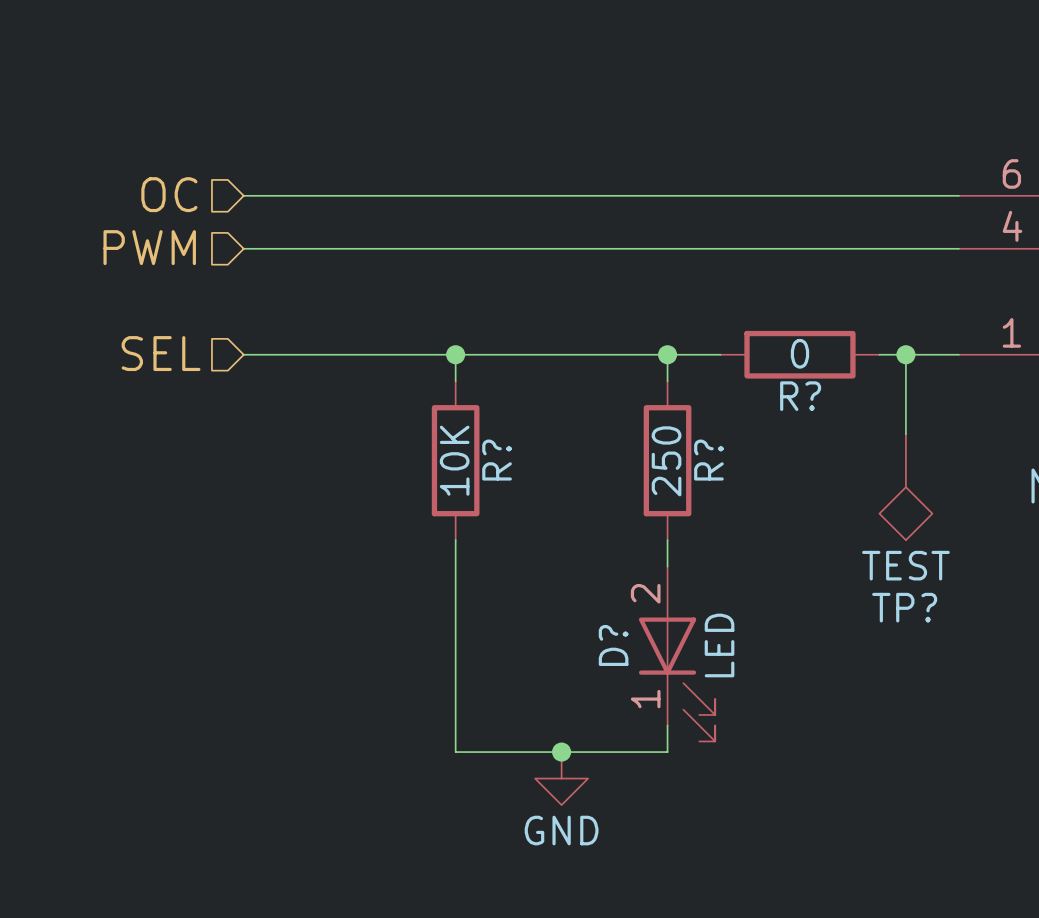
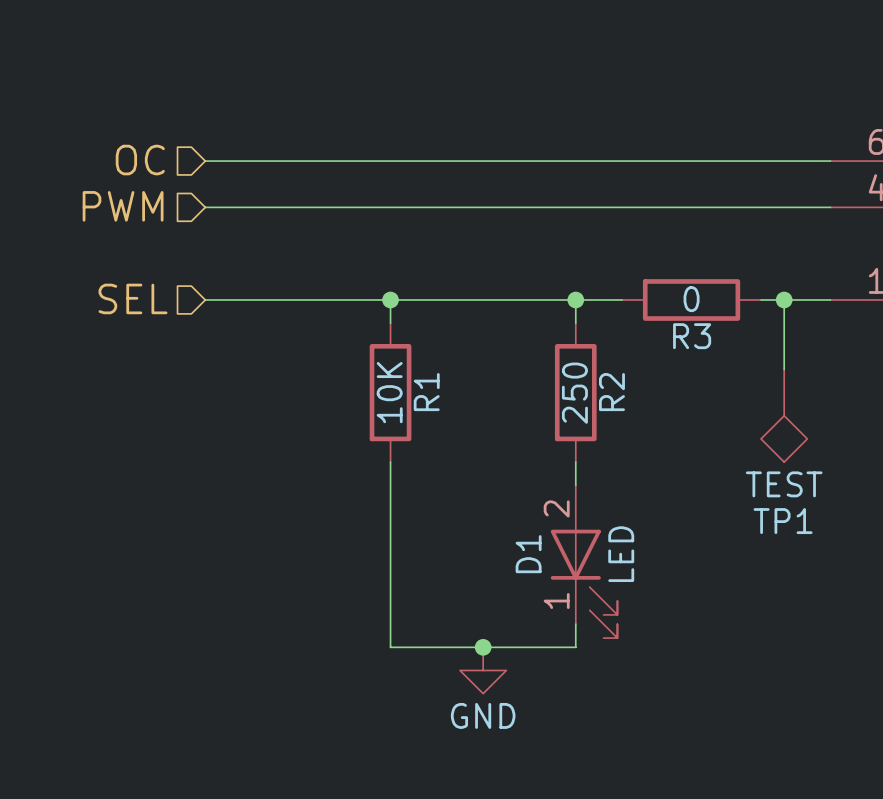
R? name: R? (800, 396) -> R3 (692, 336)
R? name: R? (497, 460) -> R1 (426, 392)
R? name: R? (708, 460) -> R2 (611, 392)
TP? name: TP? (904, 607) -> TP1 (783, 521)
D? name: D? (613, 645) -> D1 (528, 554)

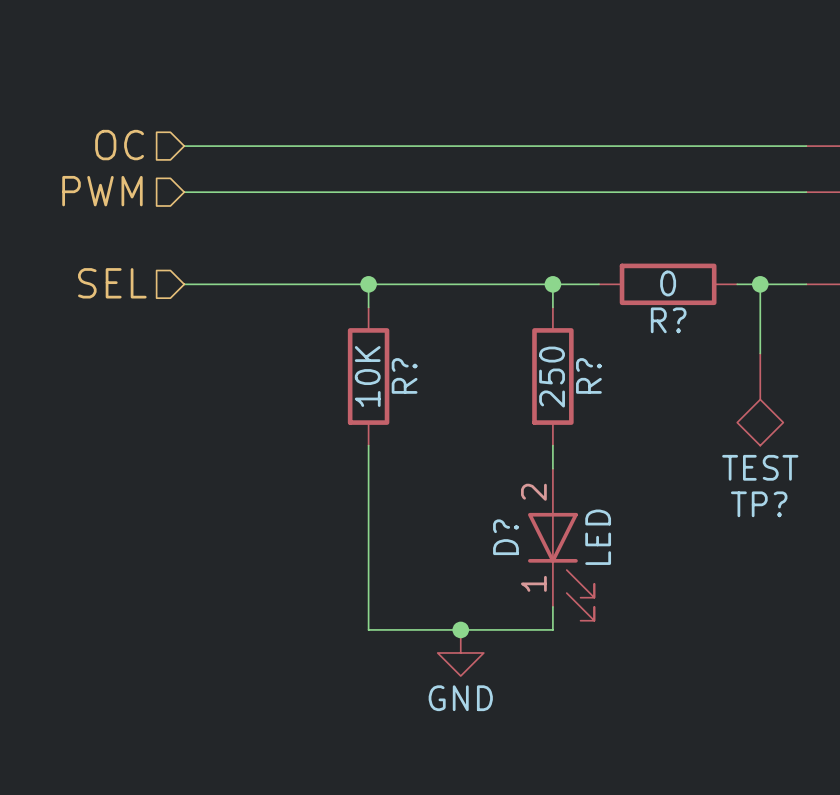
R3 name: R3 (692, 336) -> R? (668, 320)
R1 name: R1 (426, 392) -> R? (404, 375)
R2 name: R2 (611, 392) -> R? (588, 375)
TP1 name: TP1 (783, 521) -> TP? (759, 504)
D1 name: D1 (528, 554) -> D? (505, 537)

